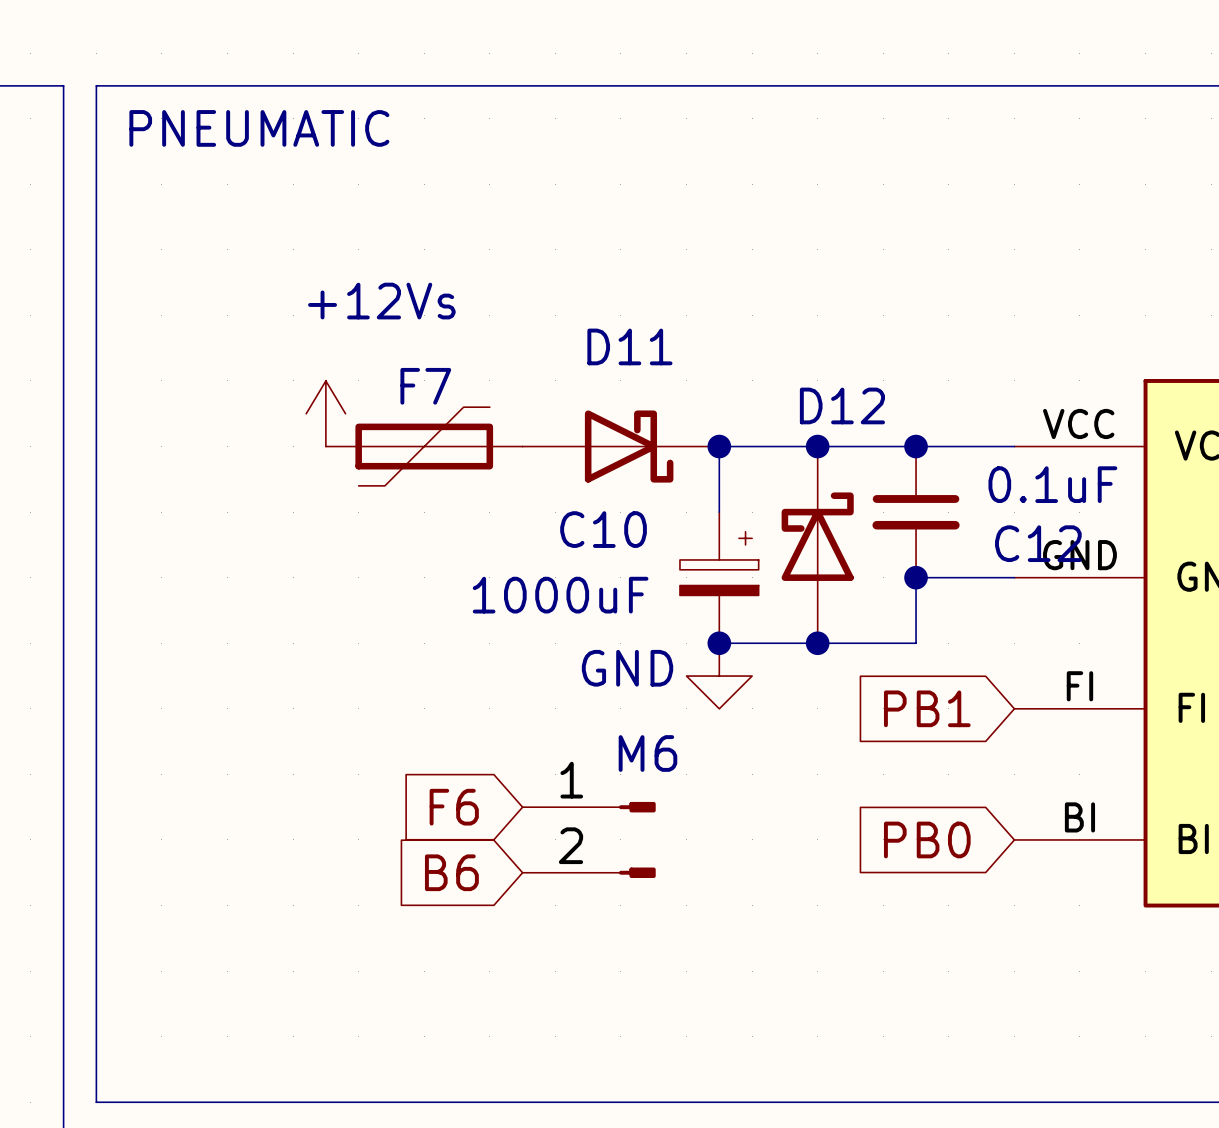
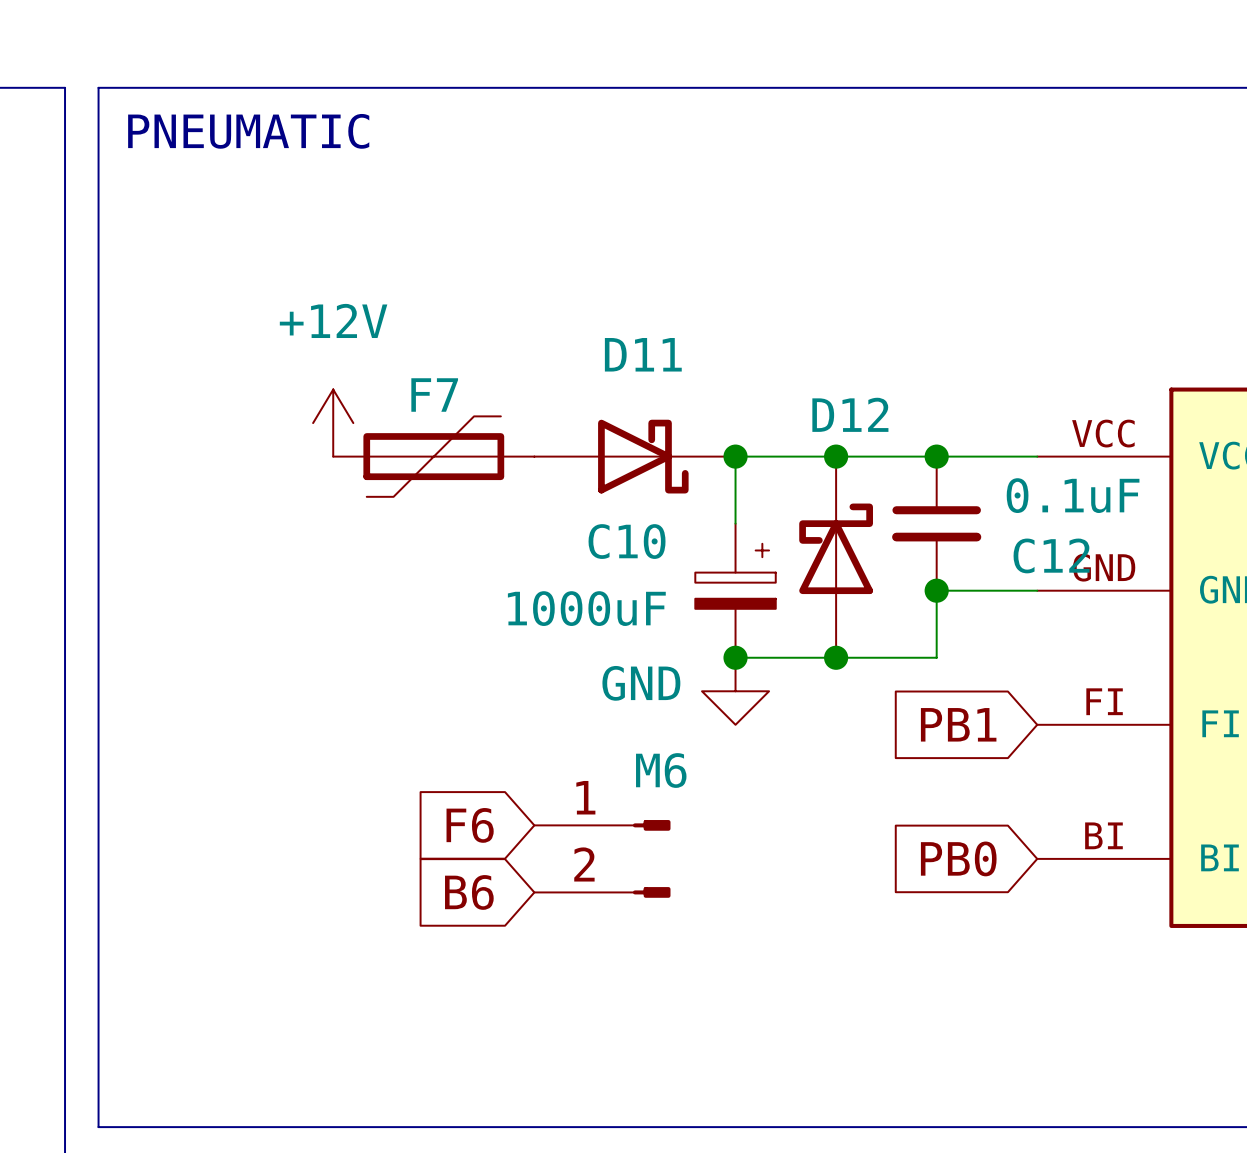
power symbol: +12Vs (325, 413) -> +12V (333, 423)

